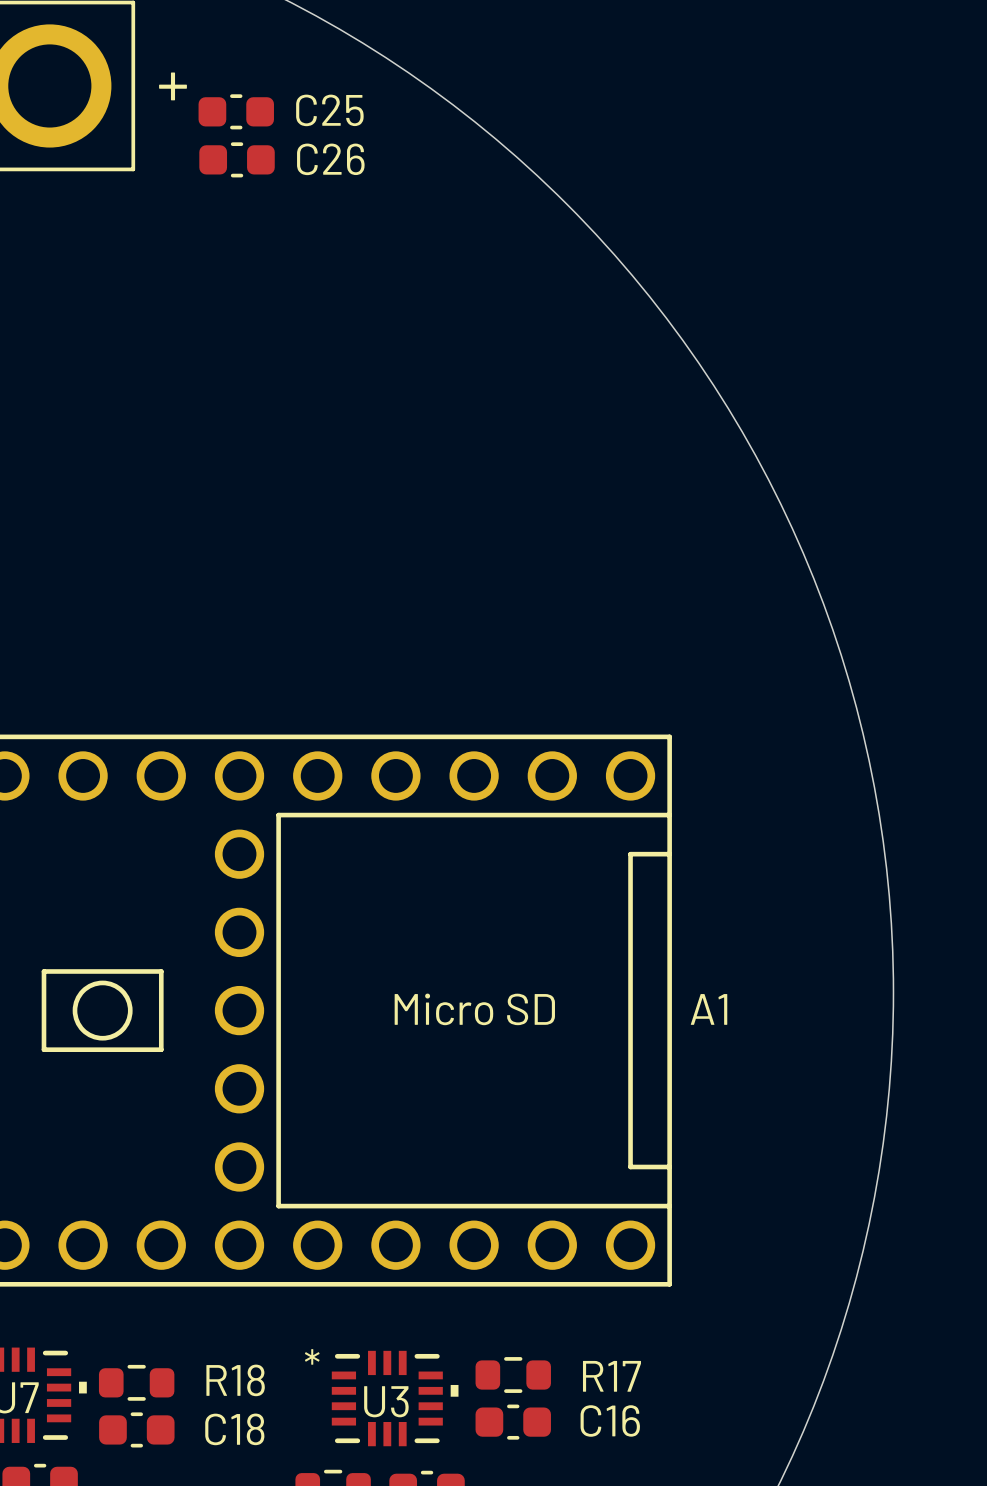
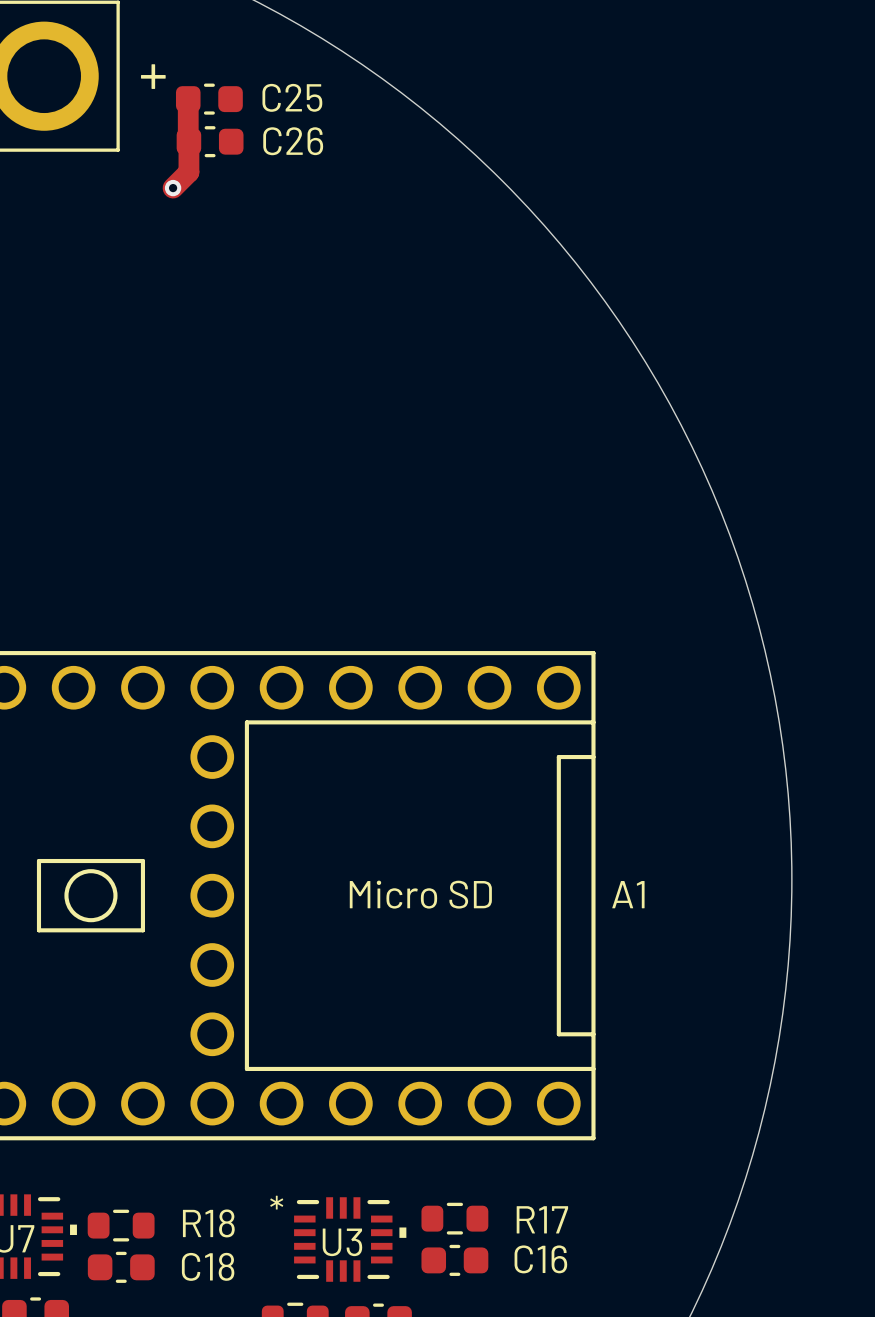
top track: none -> (188, 99) (188, 172) (173, 188)
via: none -> (173, 188)

